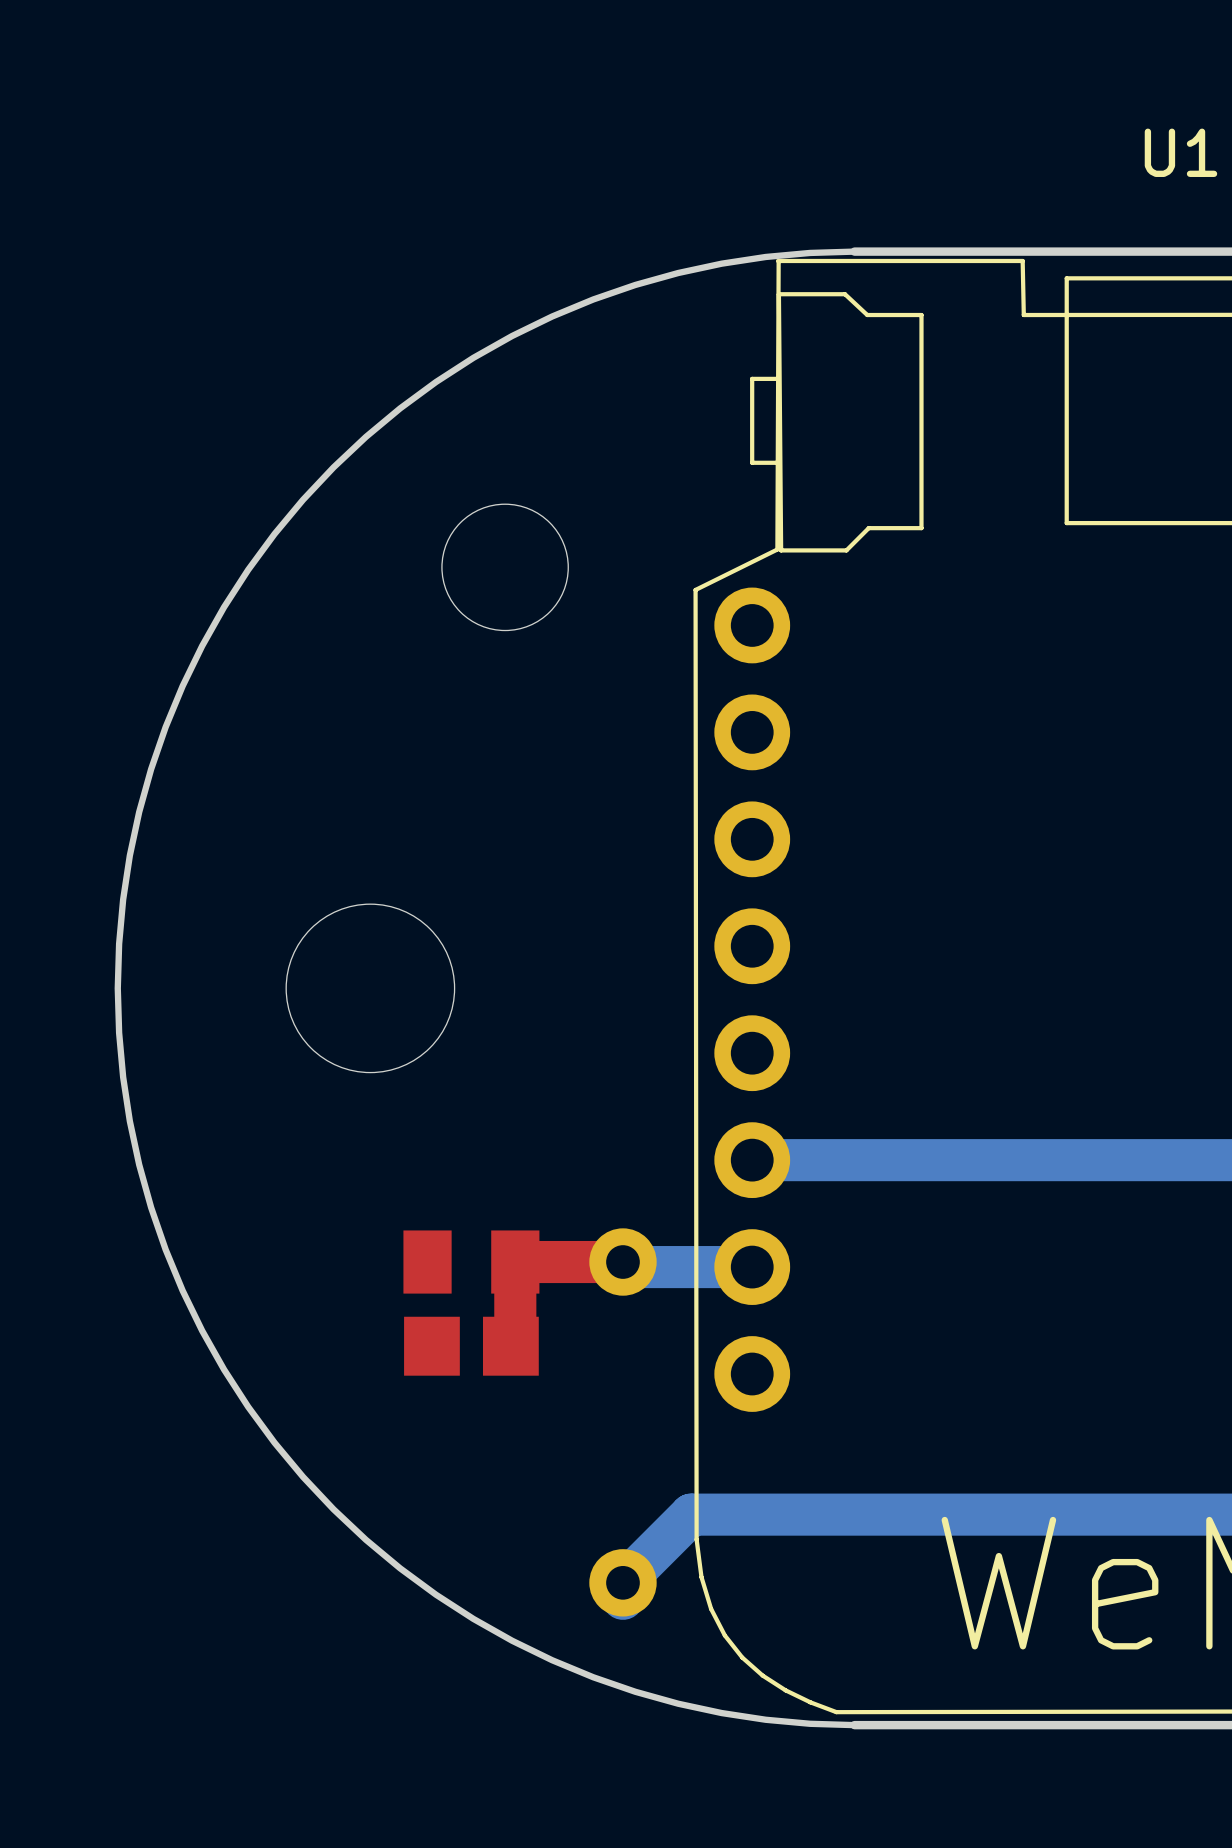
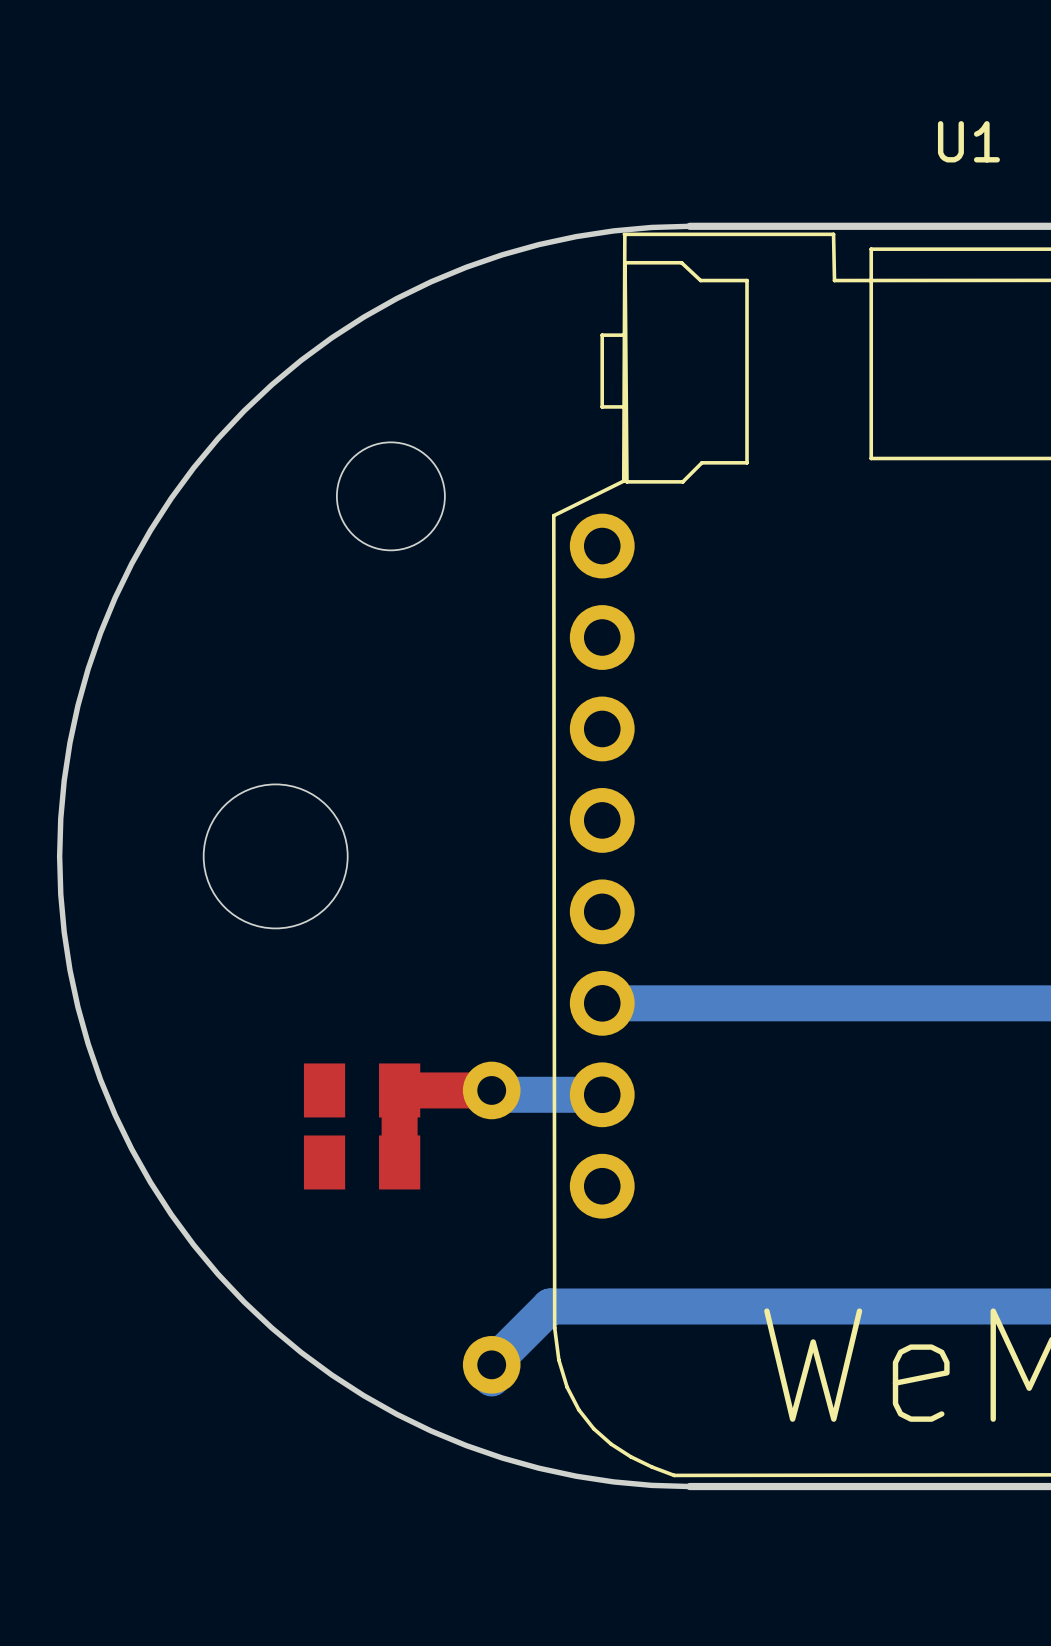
part footprint: [404, 1316, 539, 1376] -> [303, 1135, 421, 1190]

